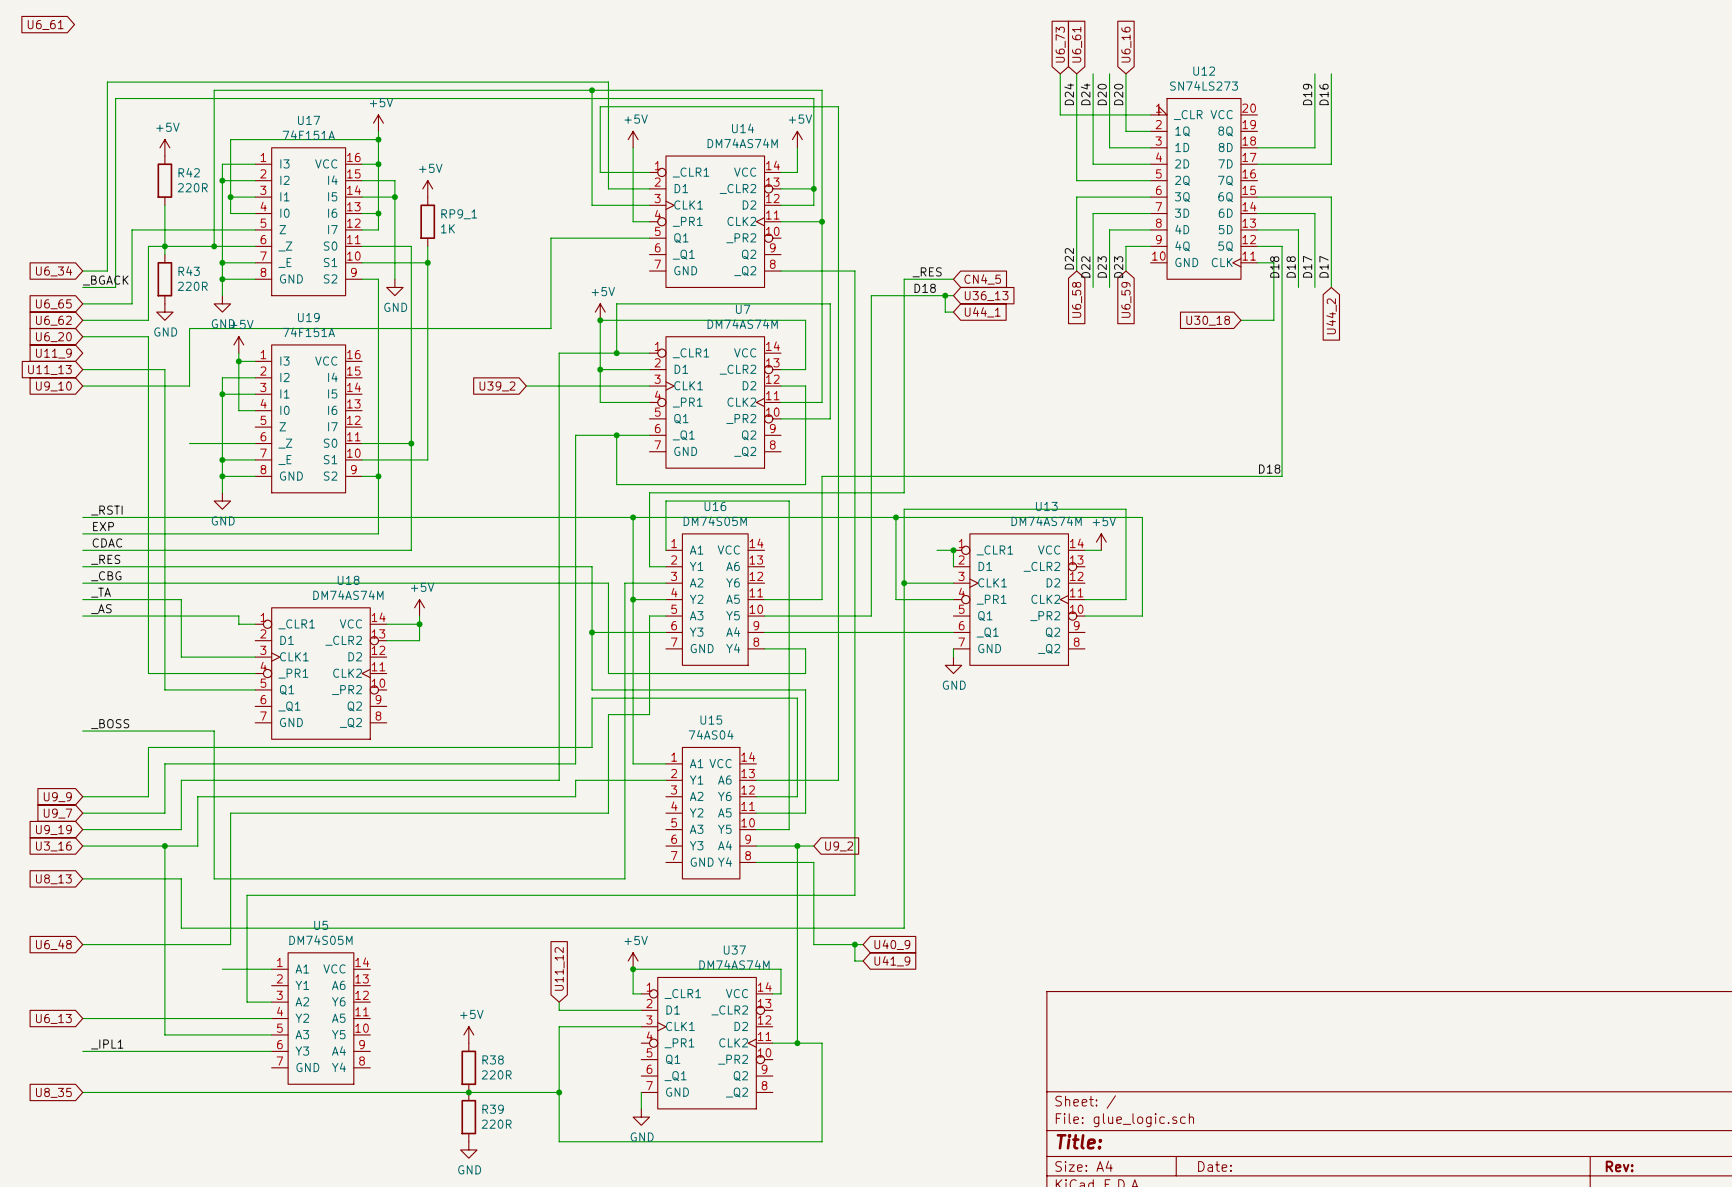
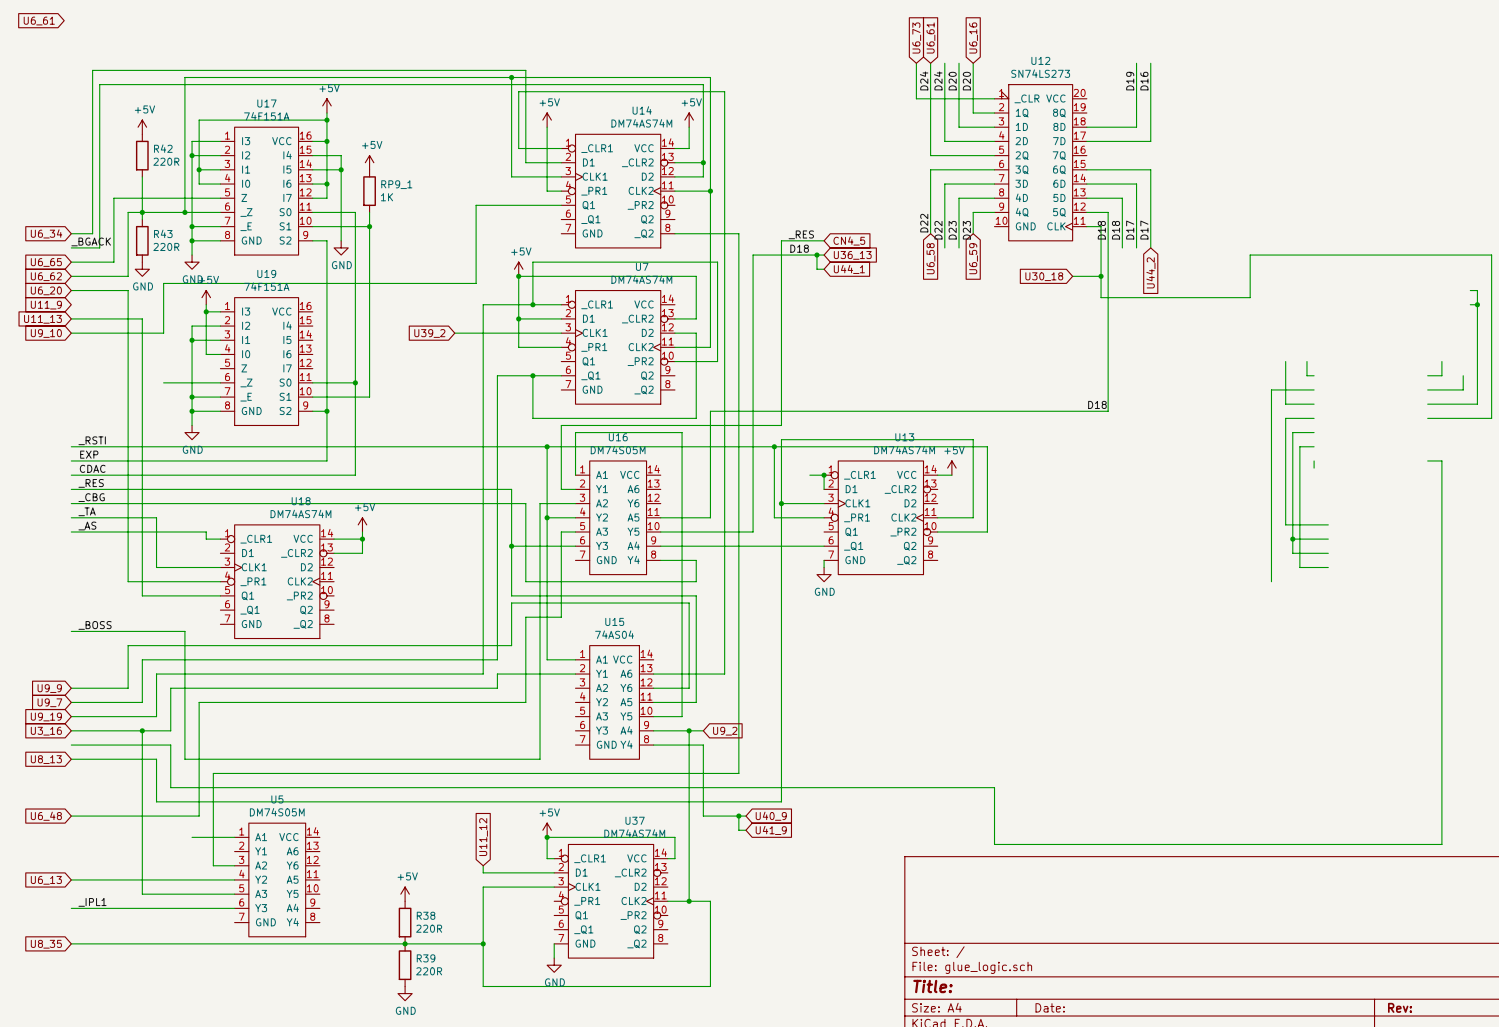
wire: none -> (1101, 276) (1101, 297) (1250, 297) (1250, 255) (1491, 255) (1491, 418) (1427, 418)
junction: none -> (1101, 276)
wire: none -> (1470, 290) (1477, 290) (1477, 404) (1427, 404)
wire: none -> (1470, 304) (1477, 304)
junction: none -> (1477, 304)
wire: none -> (1285, 361) (1285, 404) (1314, 404)
wire: none -> (1306, 361) (1306, 375) (1314, 375)
wire: none -> (1441, 361) (1441, 375) (1427, 375)
wire: none -> (1463, 375) (1463, 389) (1427, 389)
wire: none -> (1314, 389) (1271, 389) (1271, 581)
wire: none -> (1314, 418) (1285, 418) (1285, 524) (1328, 524)
wire: none -> (1314, 432) (1292, 432) (1292, 553) (1328, 553)
wire: none -> (1314, 446) (1299, 446) (1299, 567) (1328, 567)
wire: none -> (1314, 460) (1314, 468)
wire: none -> (1427, 460) (1441, 460) (1441, 844) (994, 844) (994, 787) (170, 787) (170, 745) (71, 745)
wire: none -> (1292, 539) (1328, 539)
junction: none -> (1292, 539)

